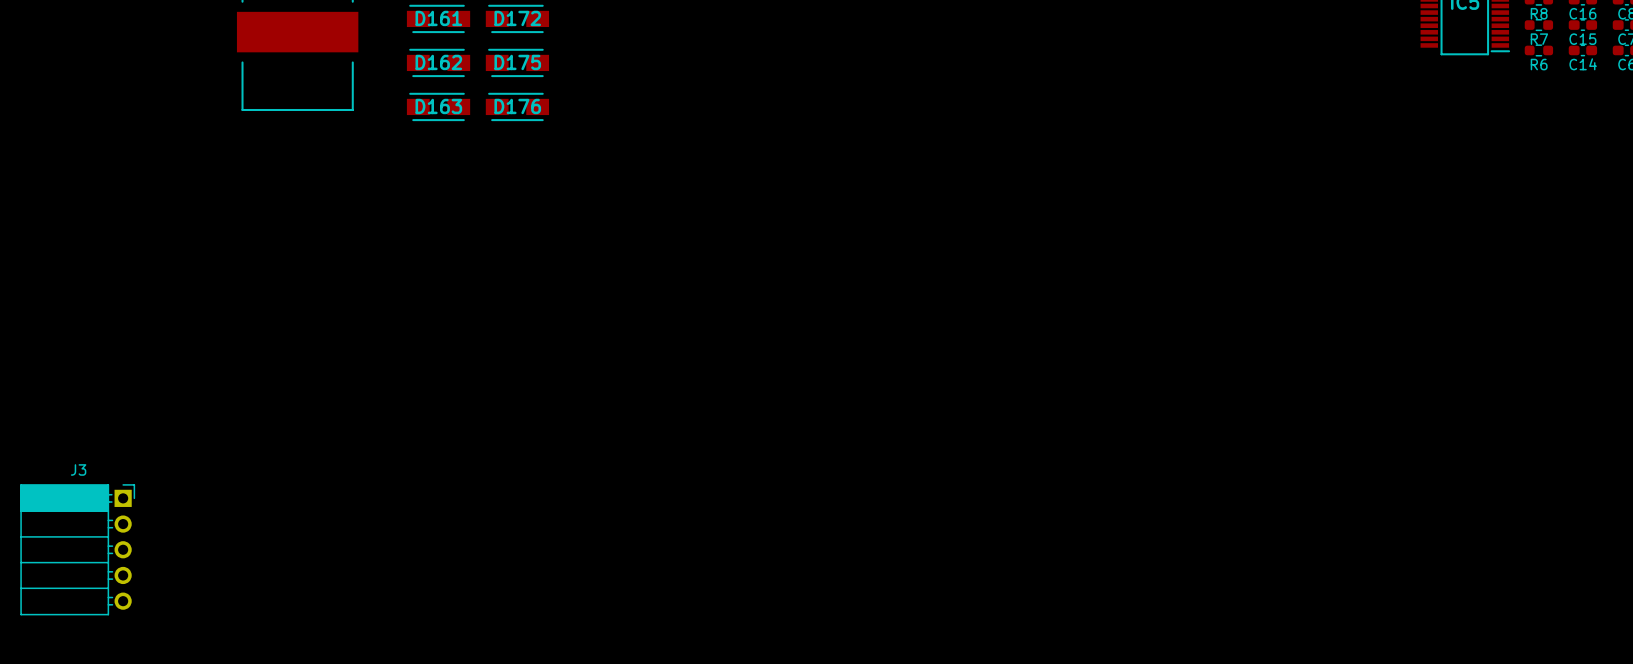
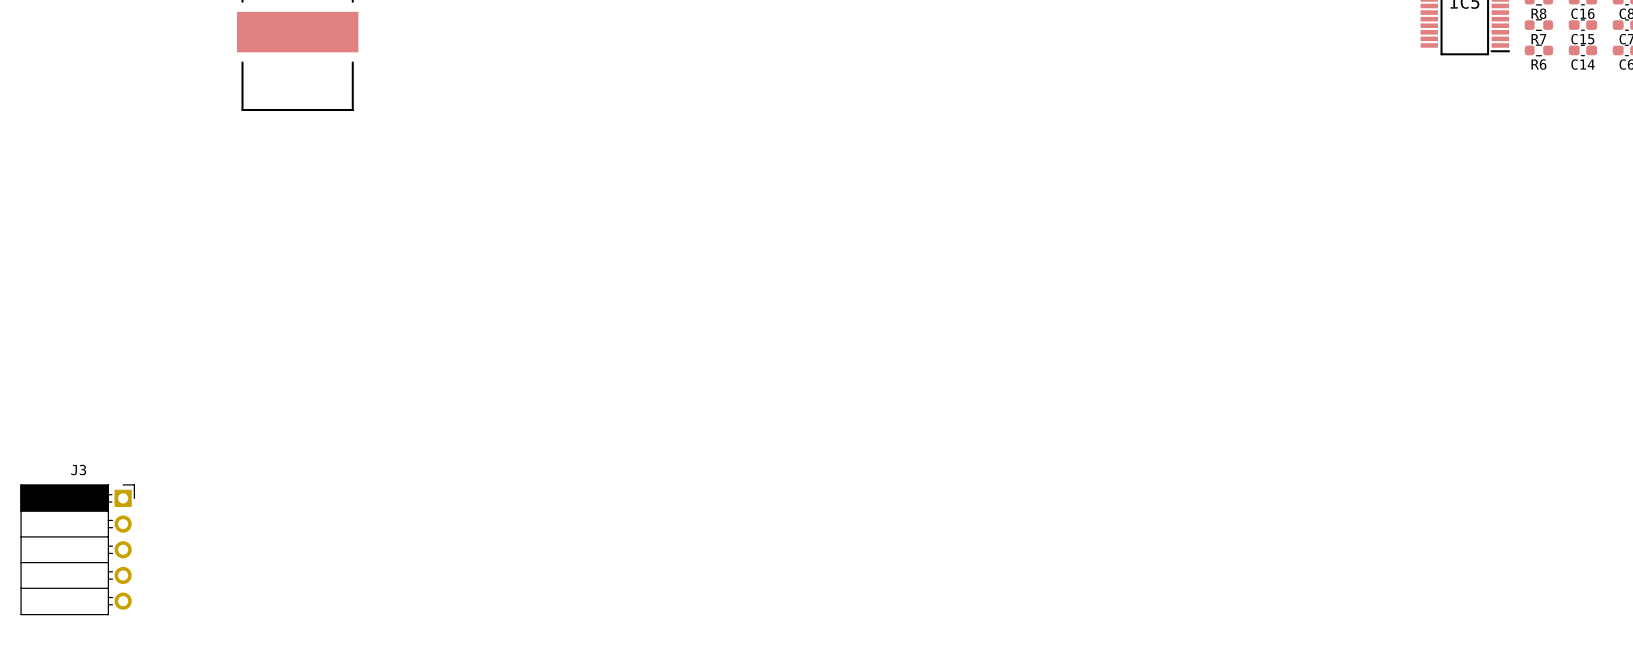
D161: (438, 18) -> none
D172: (517, 18) -> none
D162: (438, 62) -> none
D175: (517, 62) -> none
D163: (438, 106) -> none
D176: (517, 106) -> none

